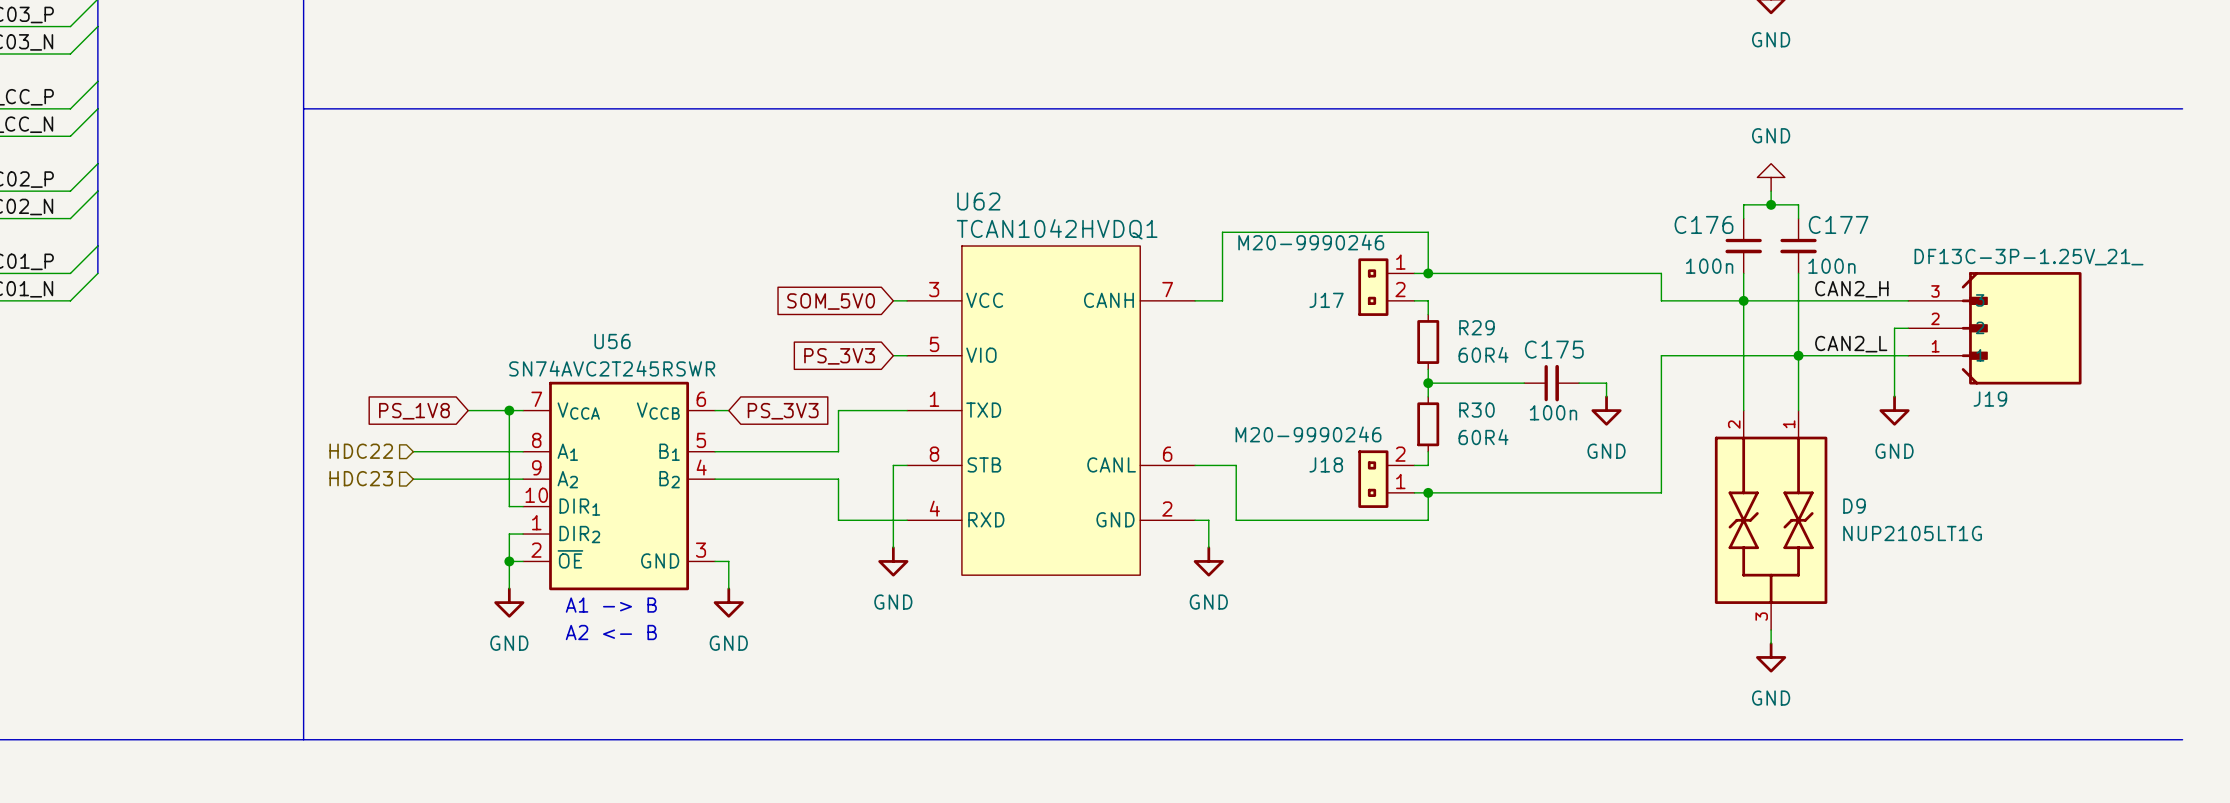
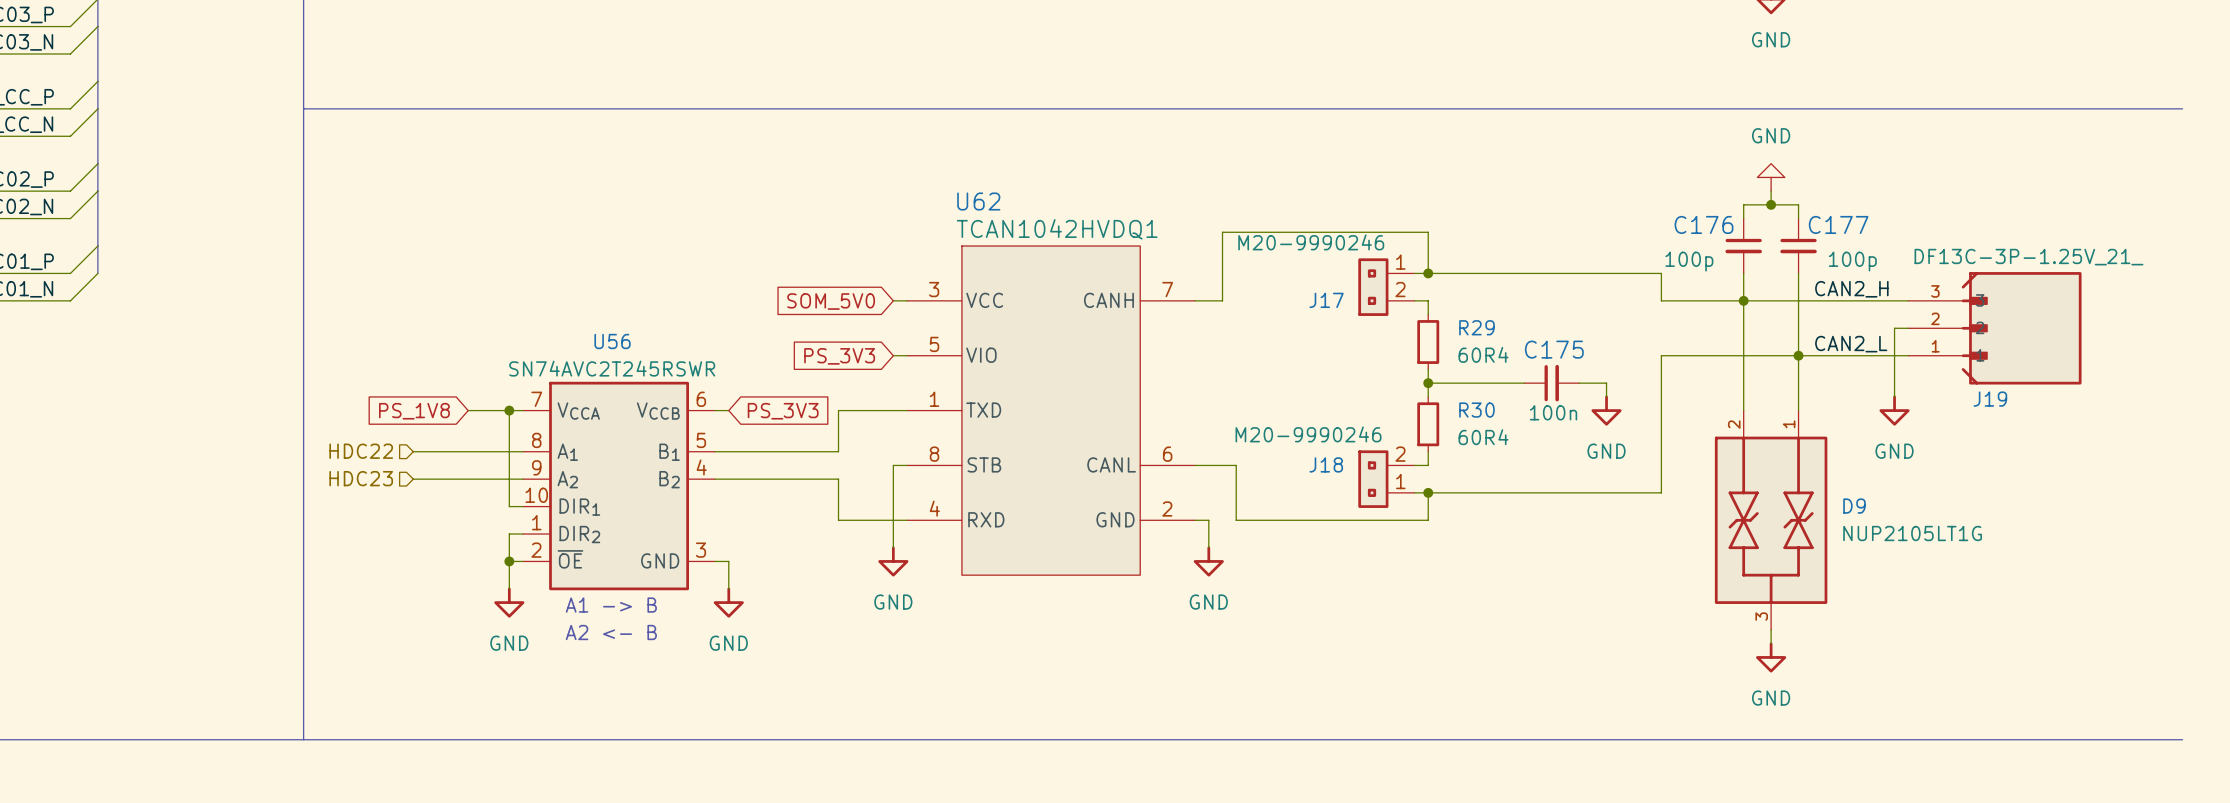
C176 text: 100n (1709, 266) -> 100p (1689, 261)
C177 text: 100n (1831, 266) -> 100p (1852, 261)

